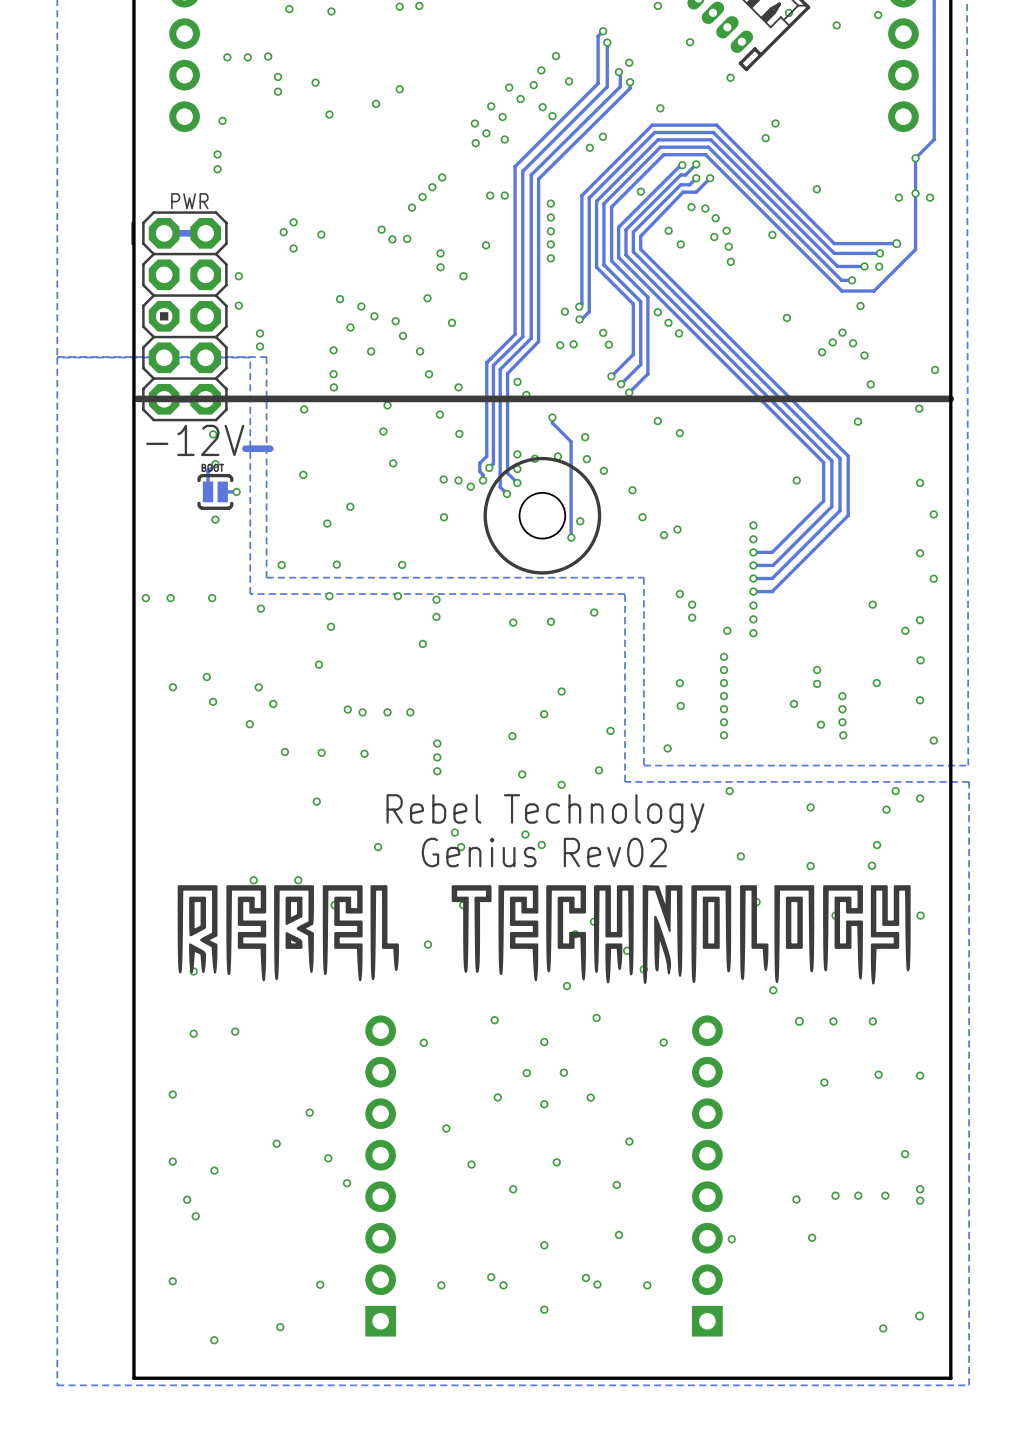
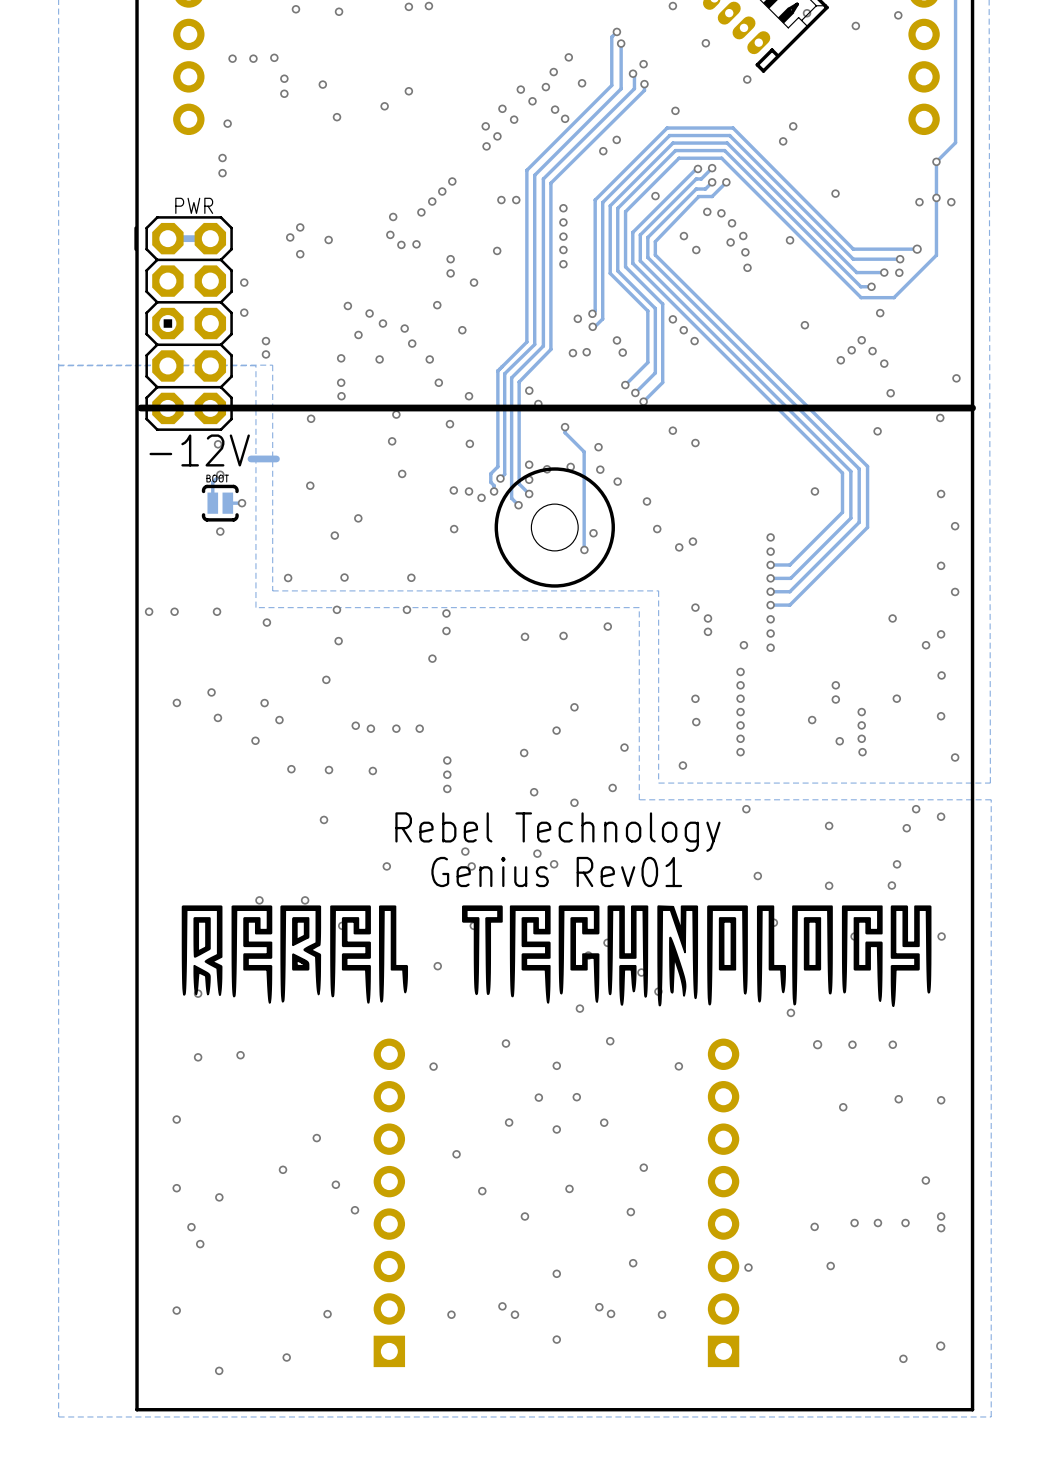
via: (504, 139) -> none
via: none -> (393, 216)
text: Genius Rev02 (544, 852) -> Genius Rev01 (556, 871)

